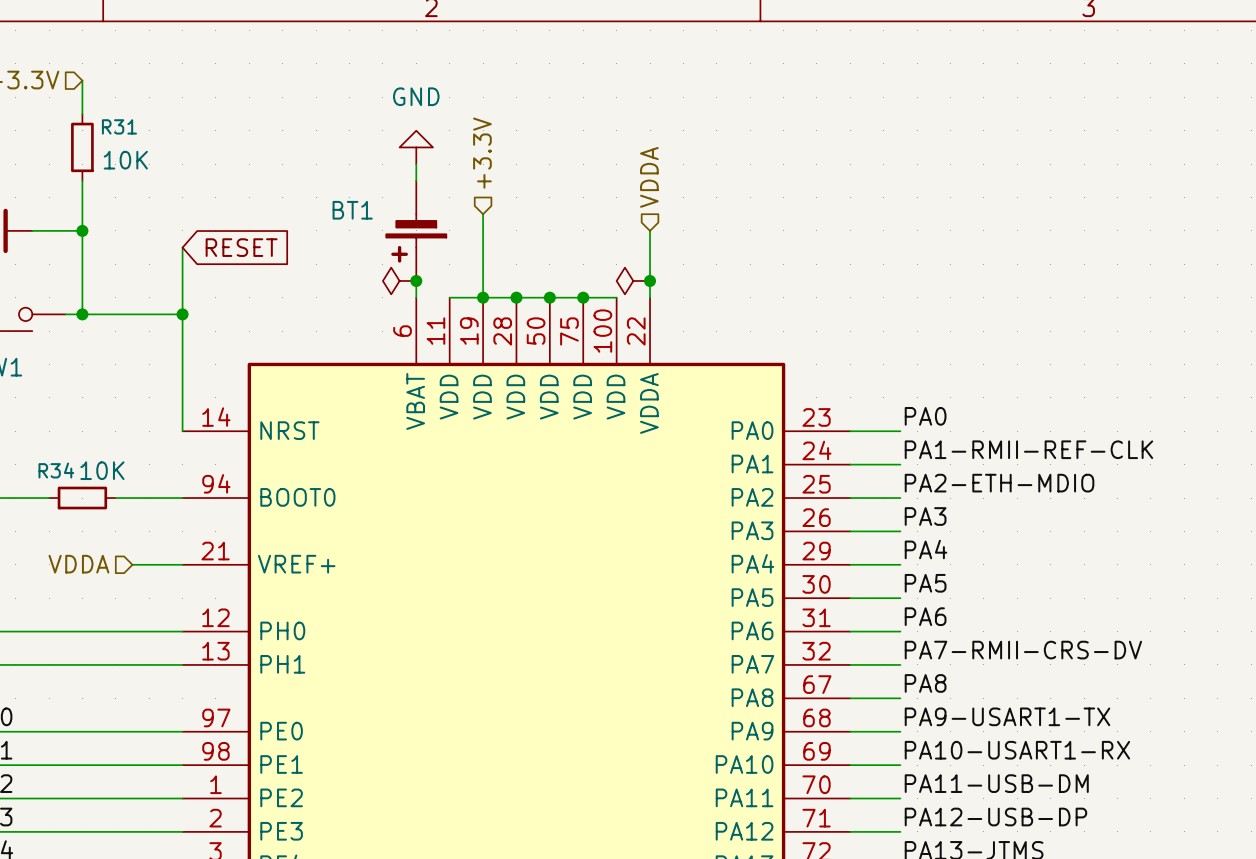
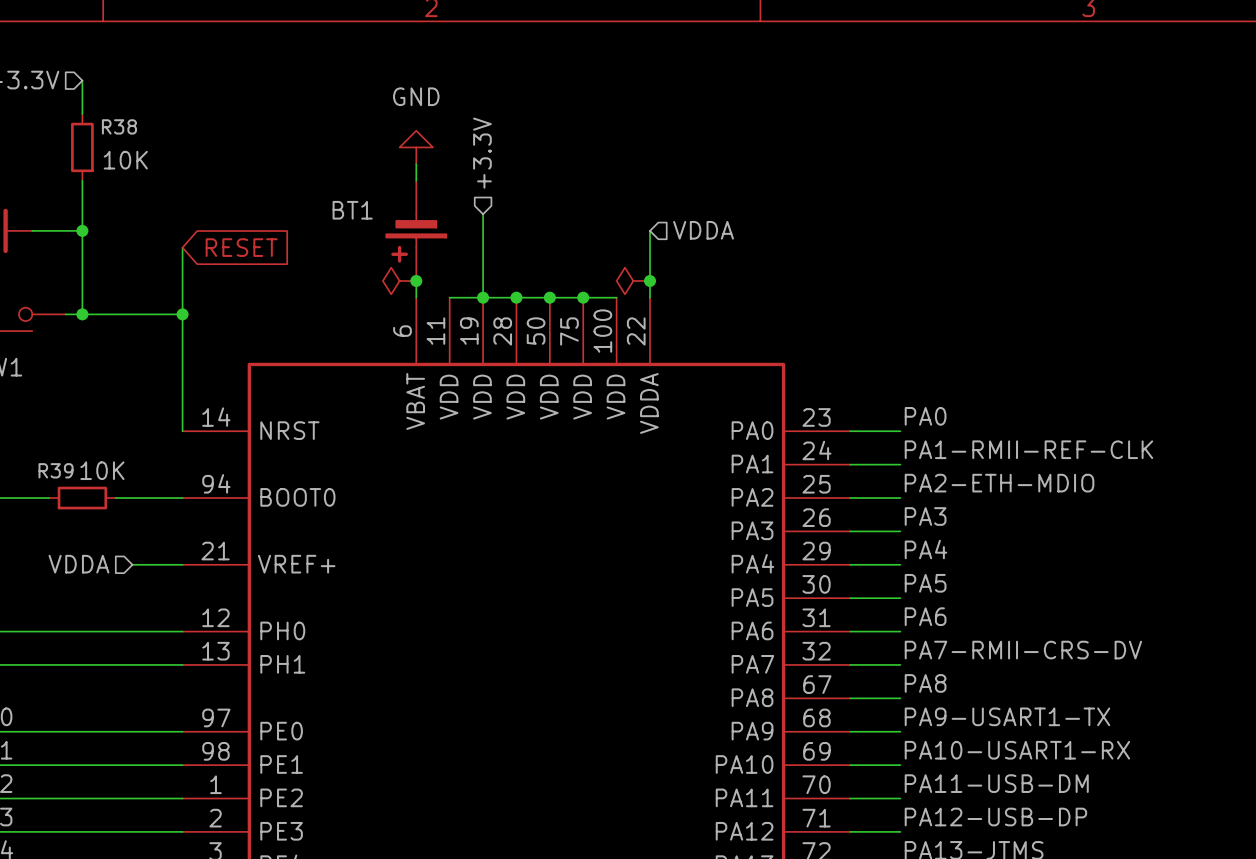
R31 name: R31 (119, 126) -> R38 (119, 126)
hierarchical label rotation: 0° (649, 177) -> 90° clockwise (703, 230)
hierarchical label position: VDDA (649, 177) -> VDDA (703, 230)
R34 name: R34 (56, 470) -> R39 (56, 470)

